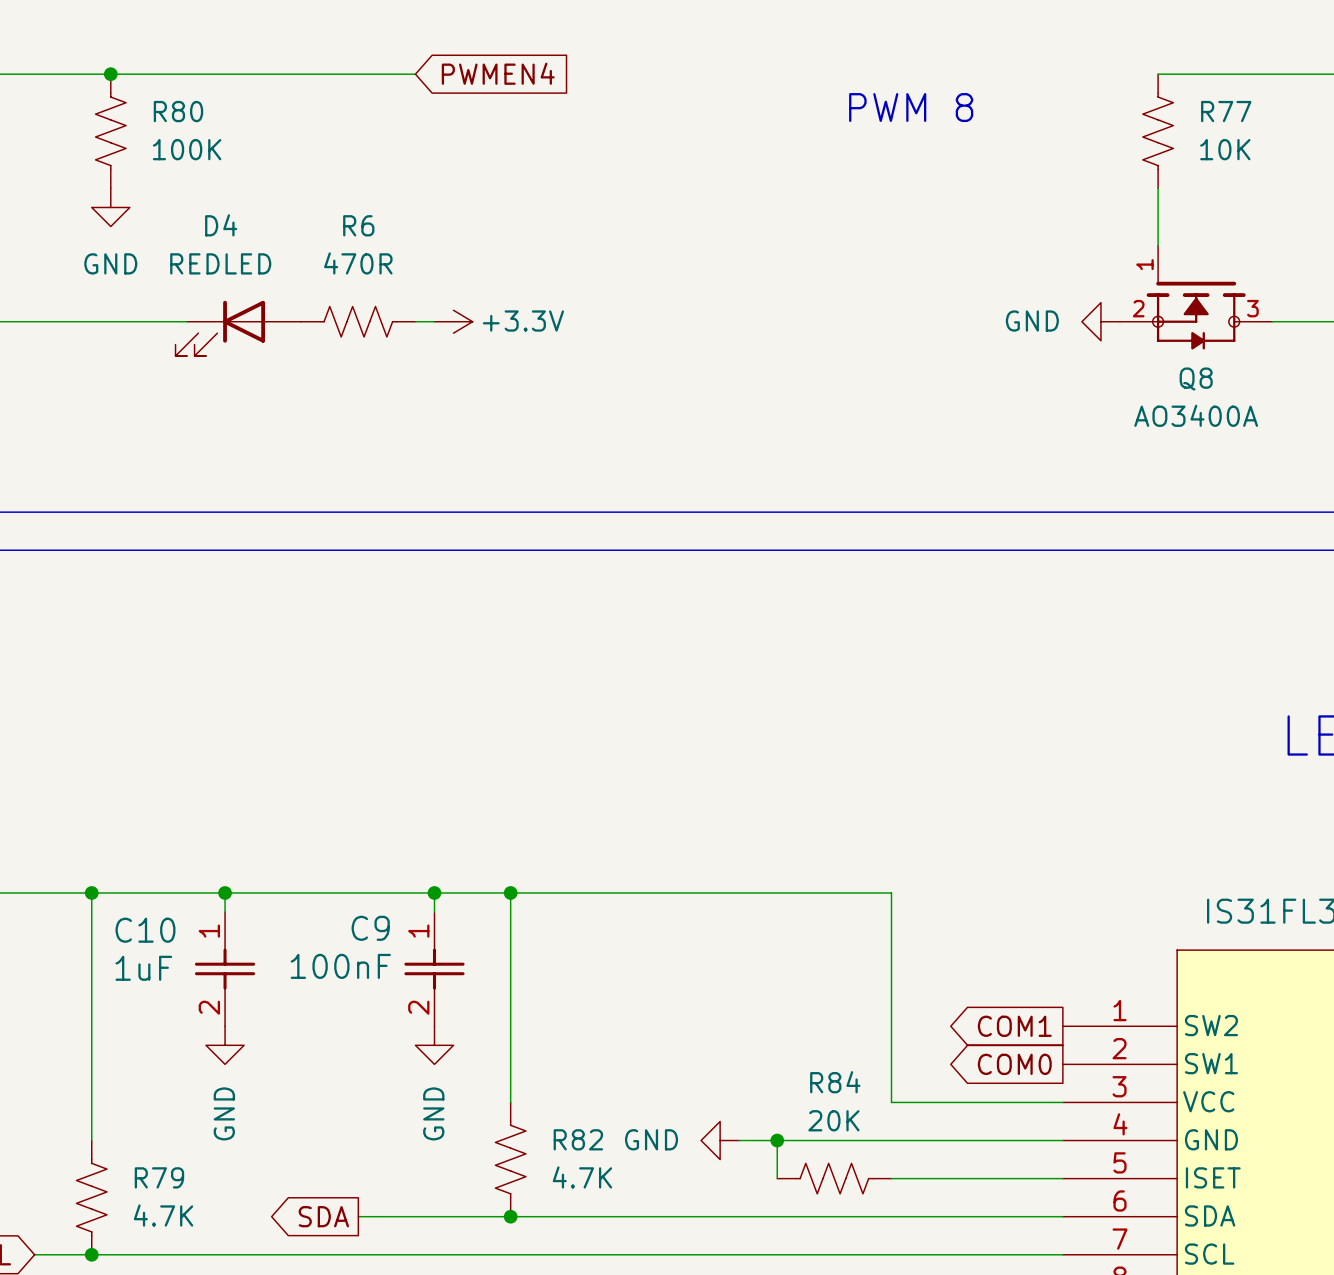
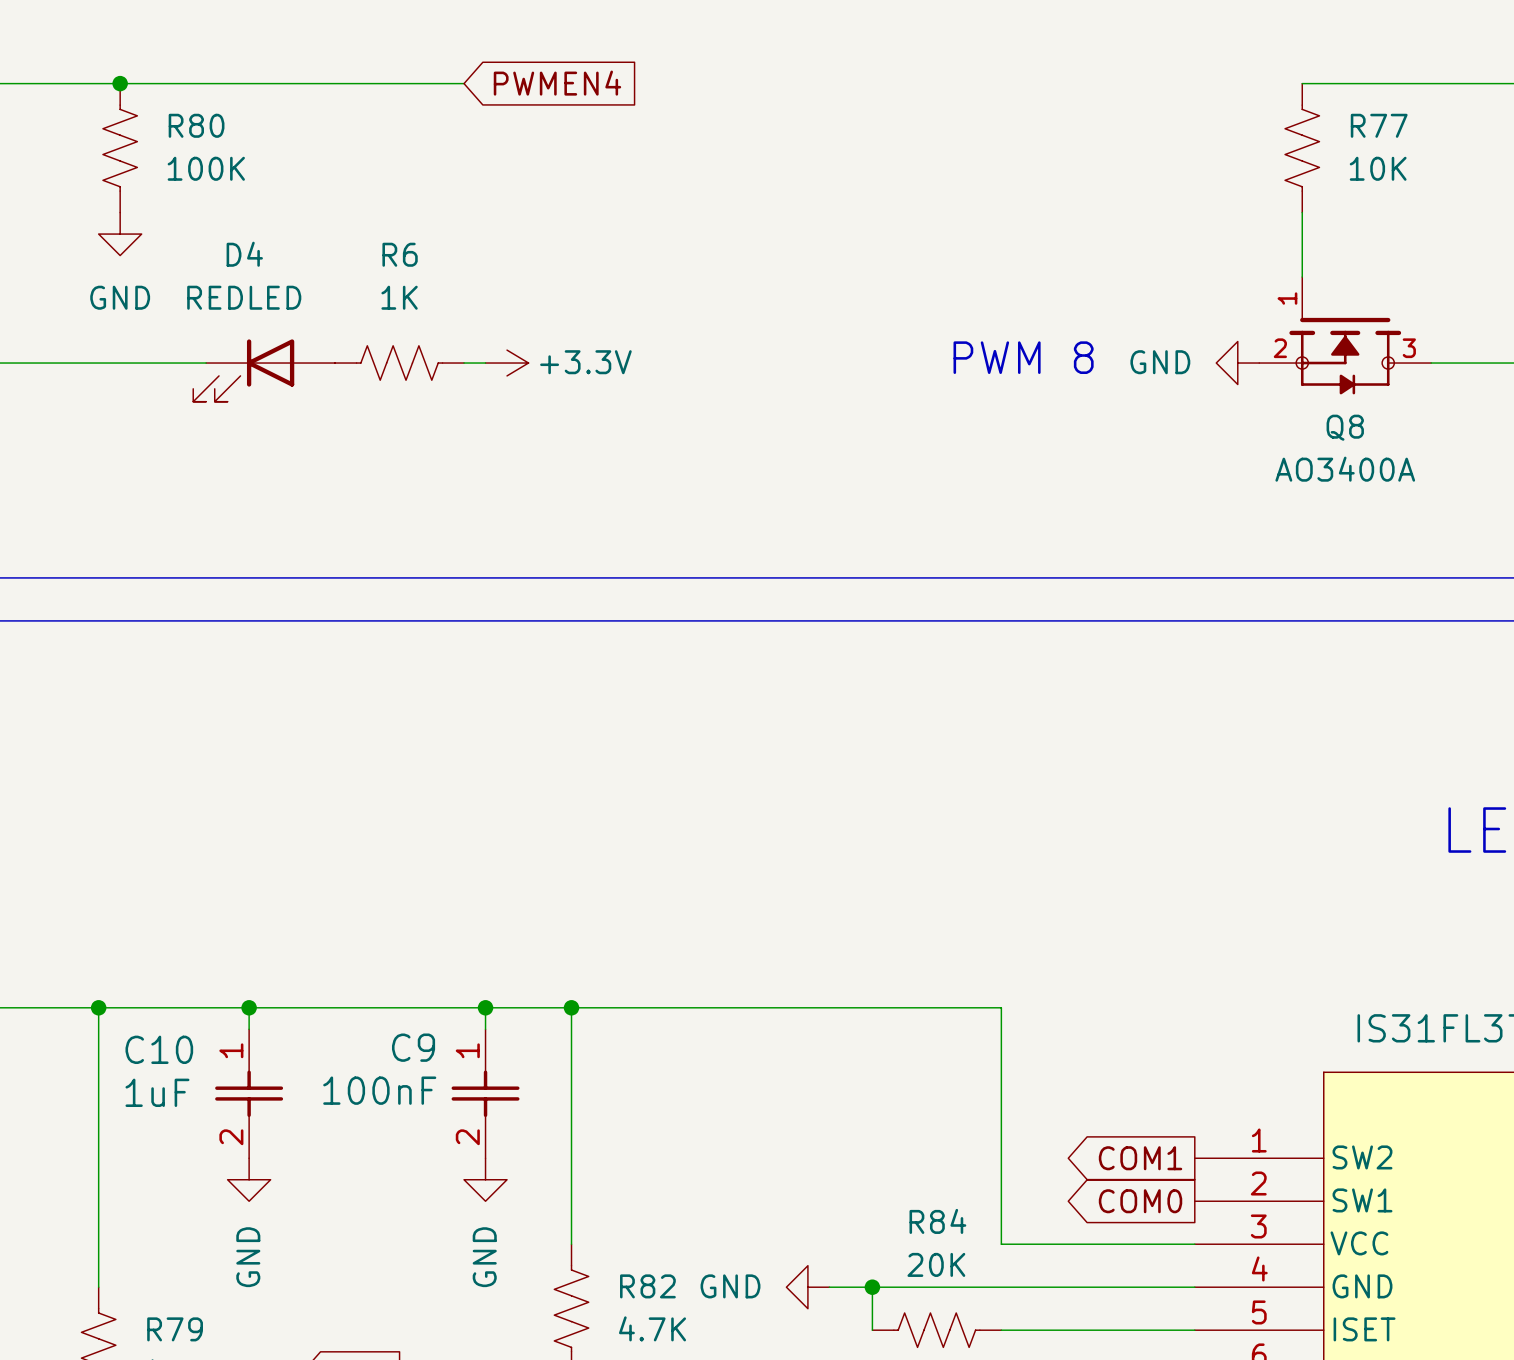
text position: PWM 8 (911, 107) -> PWM 8 (1023, 357)
R6 value: 470R (358, 263) -> 1K (399, 297)

